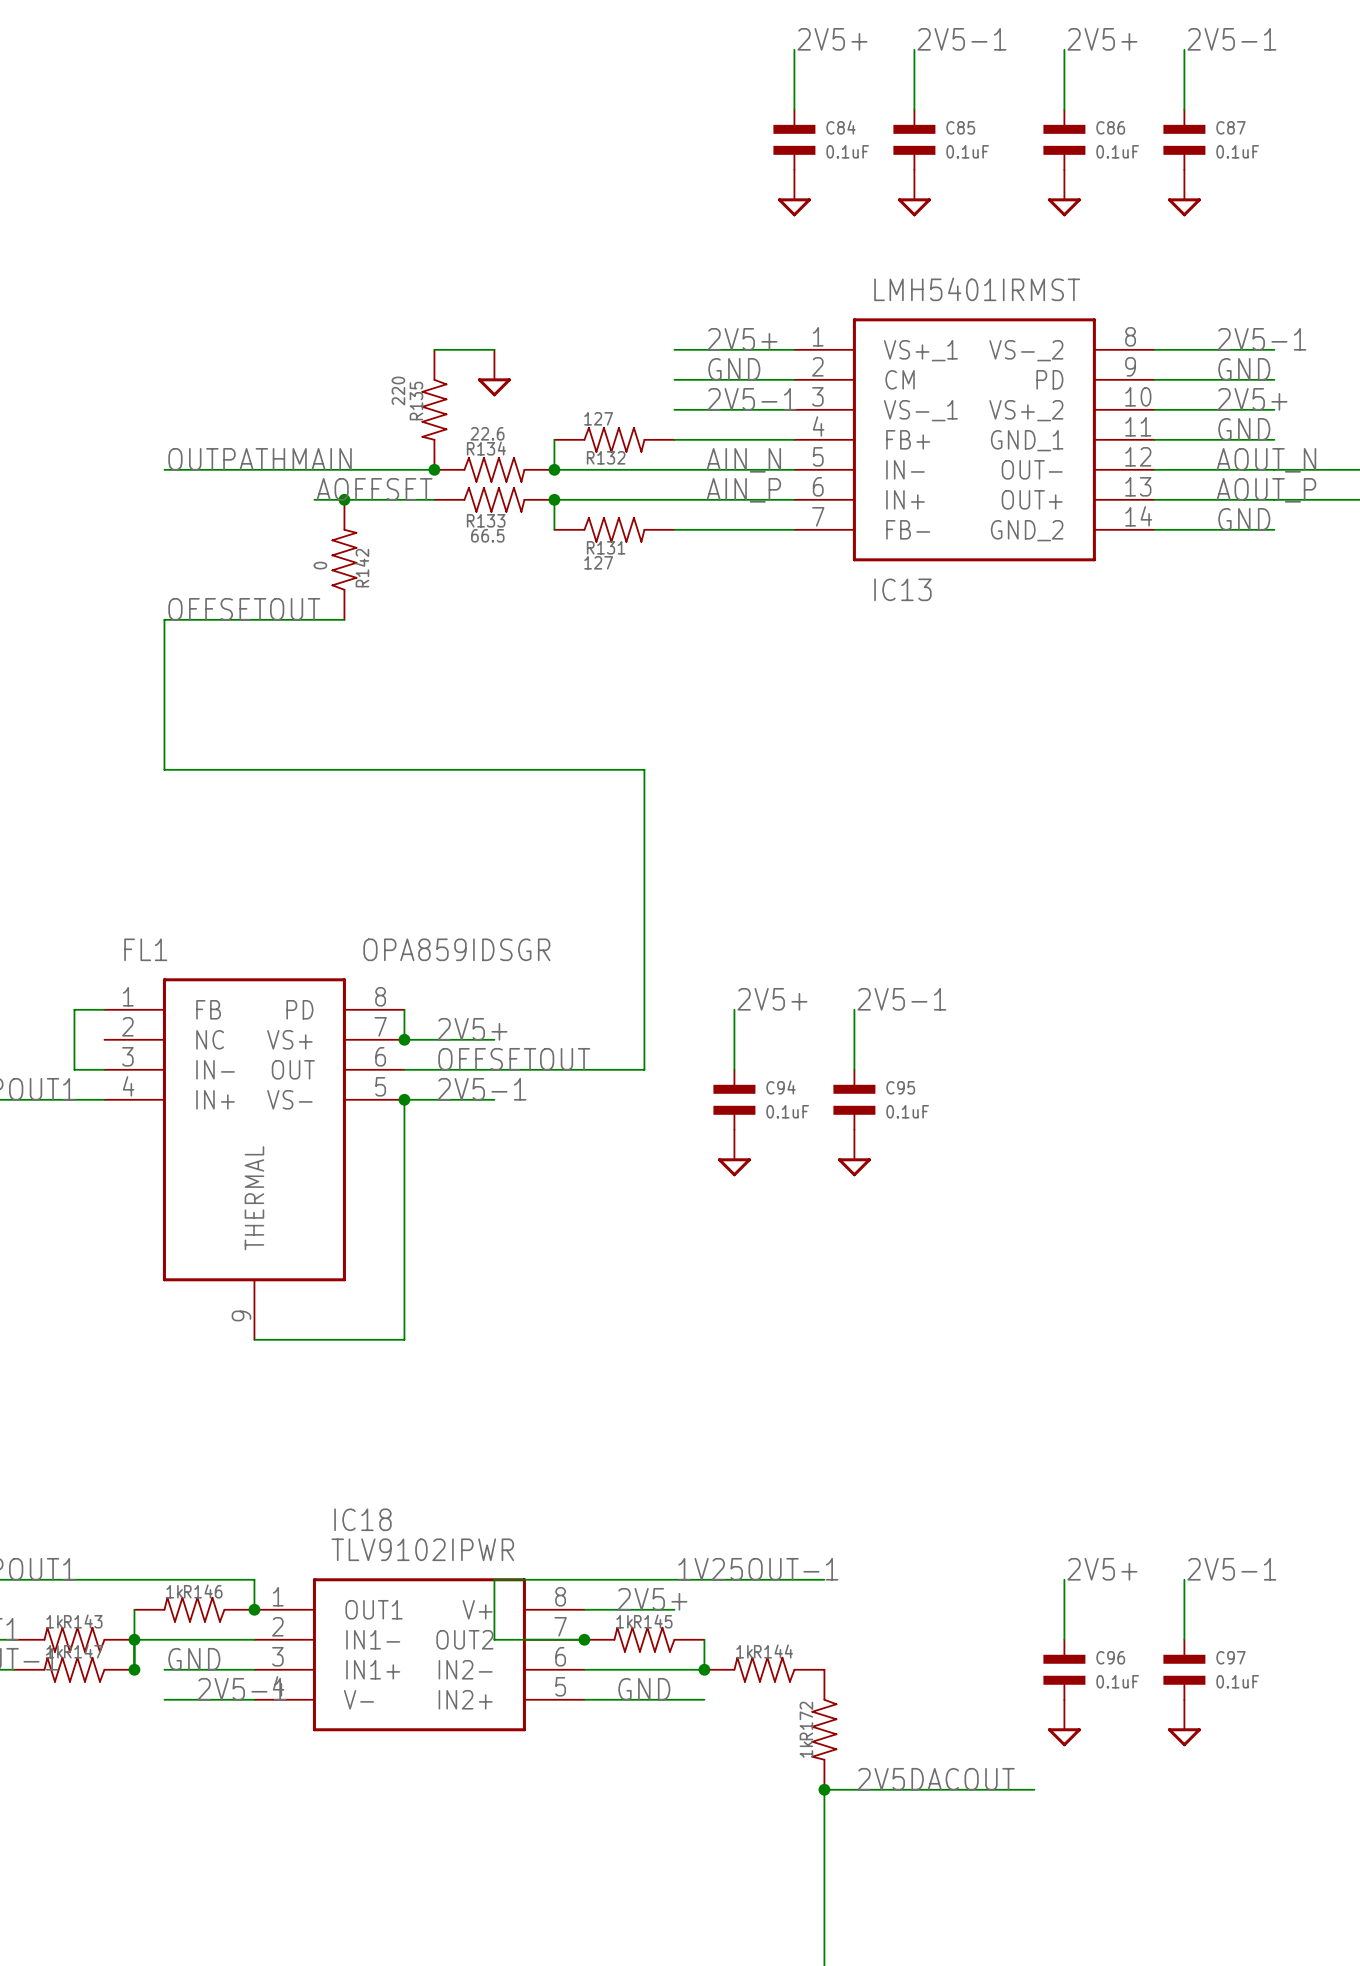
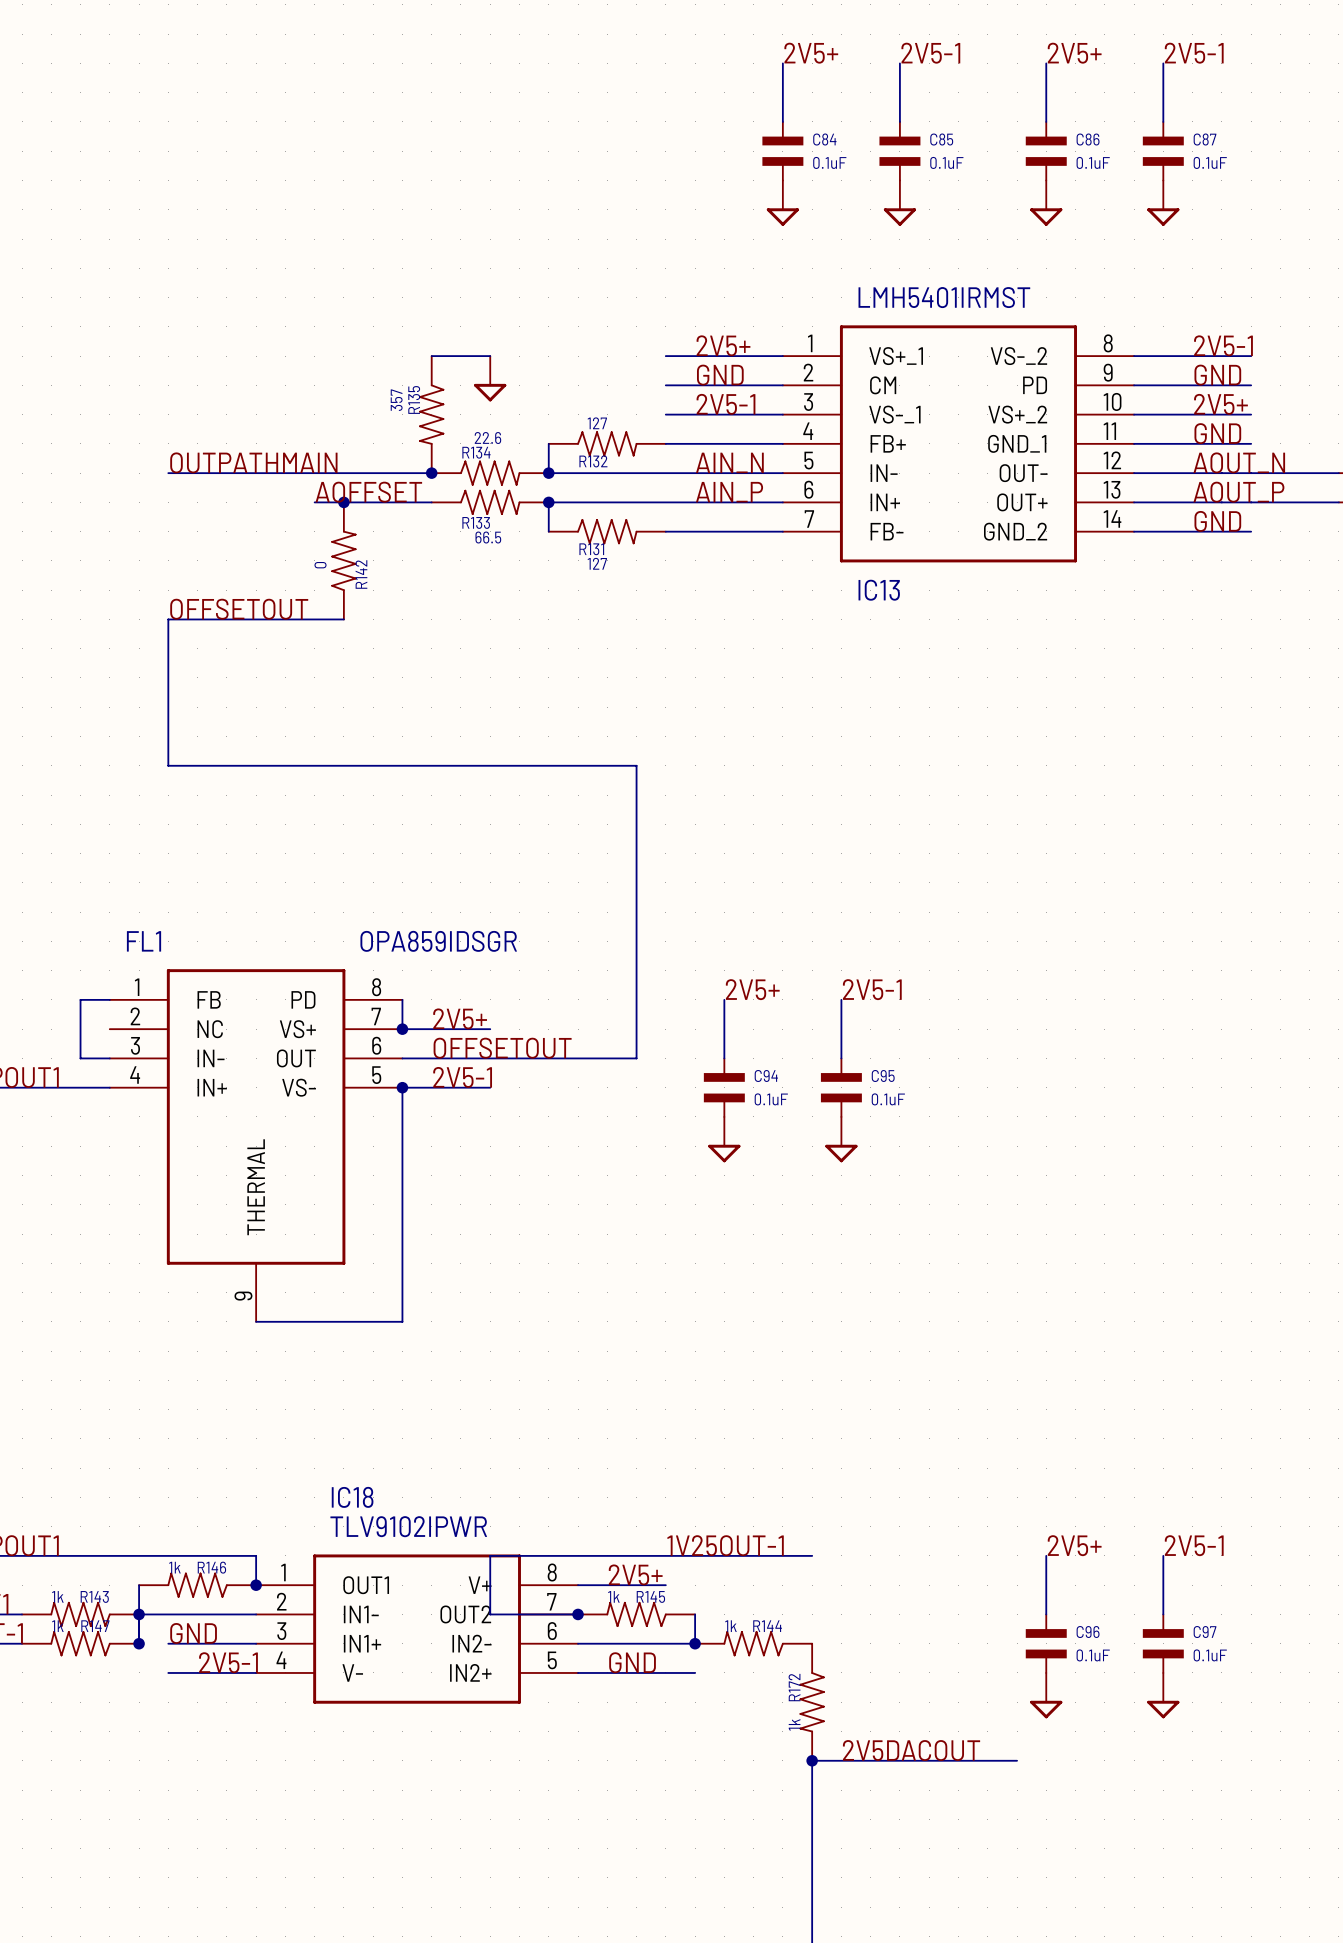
R135 value: 220 (398, 391) -> 357 (396, 400)

